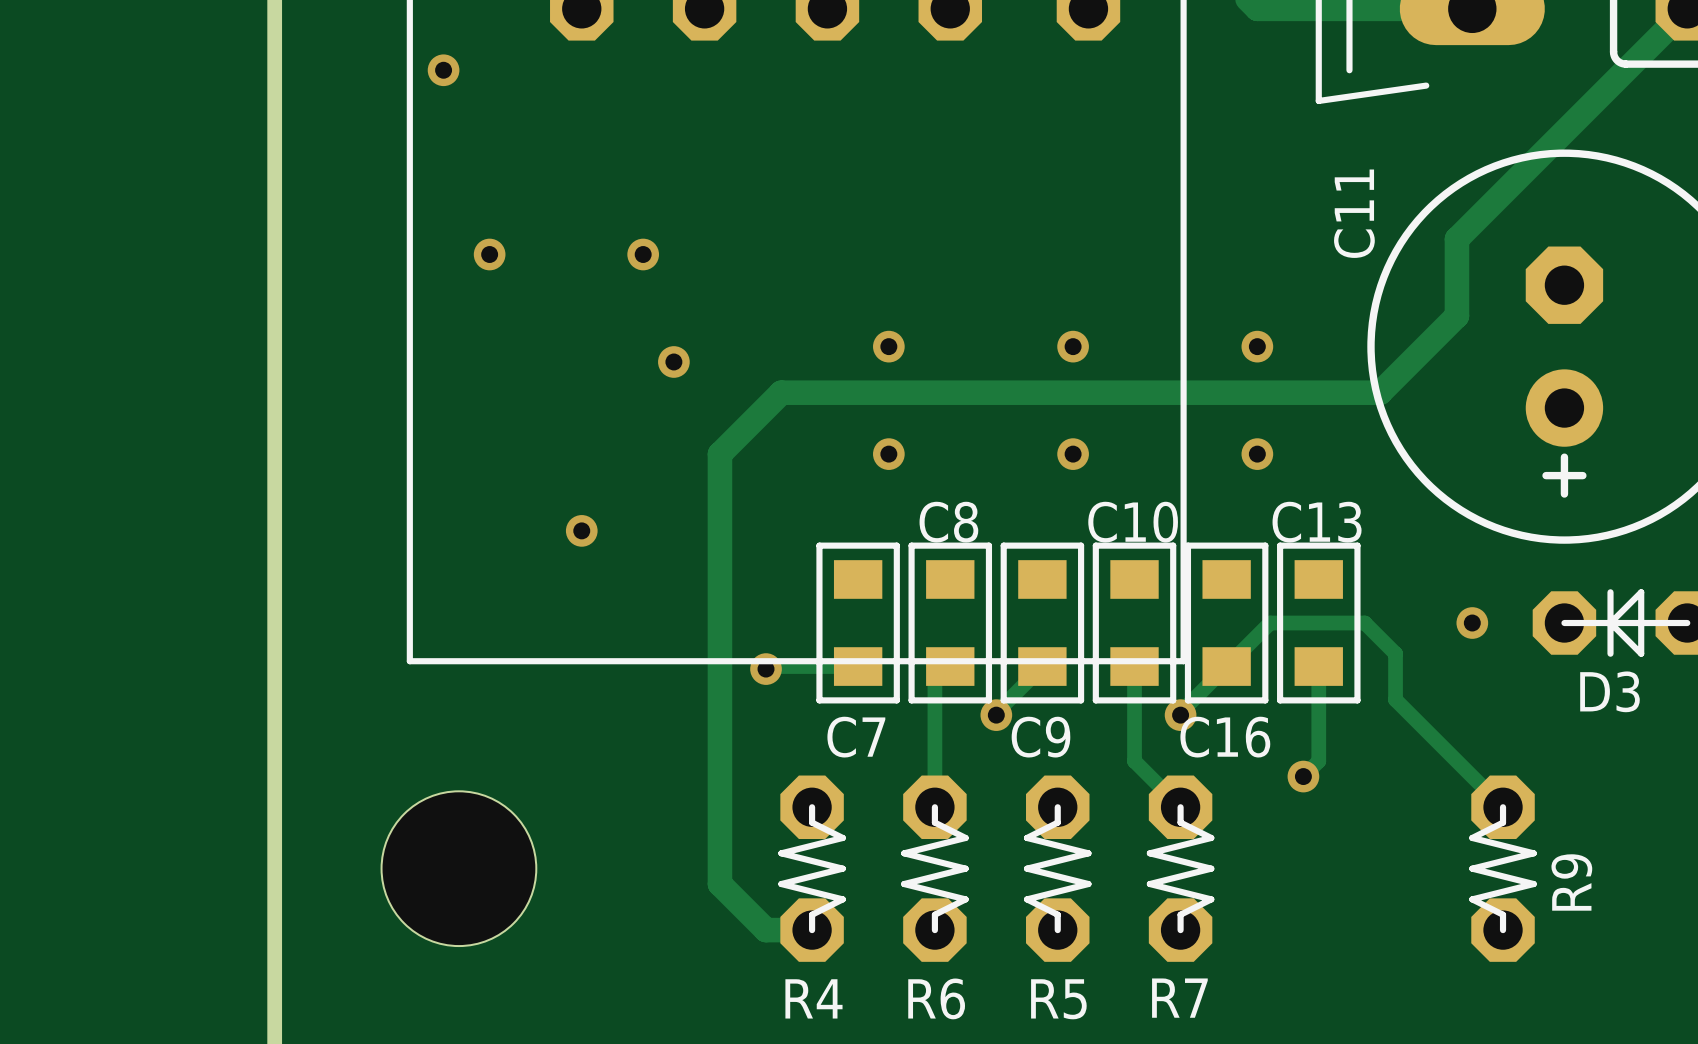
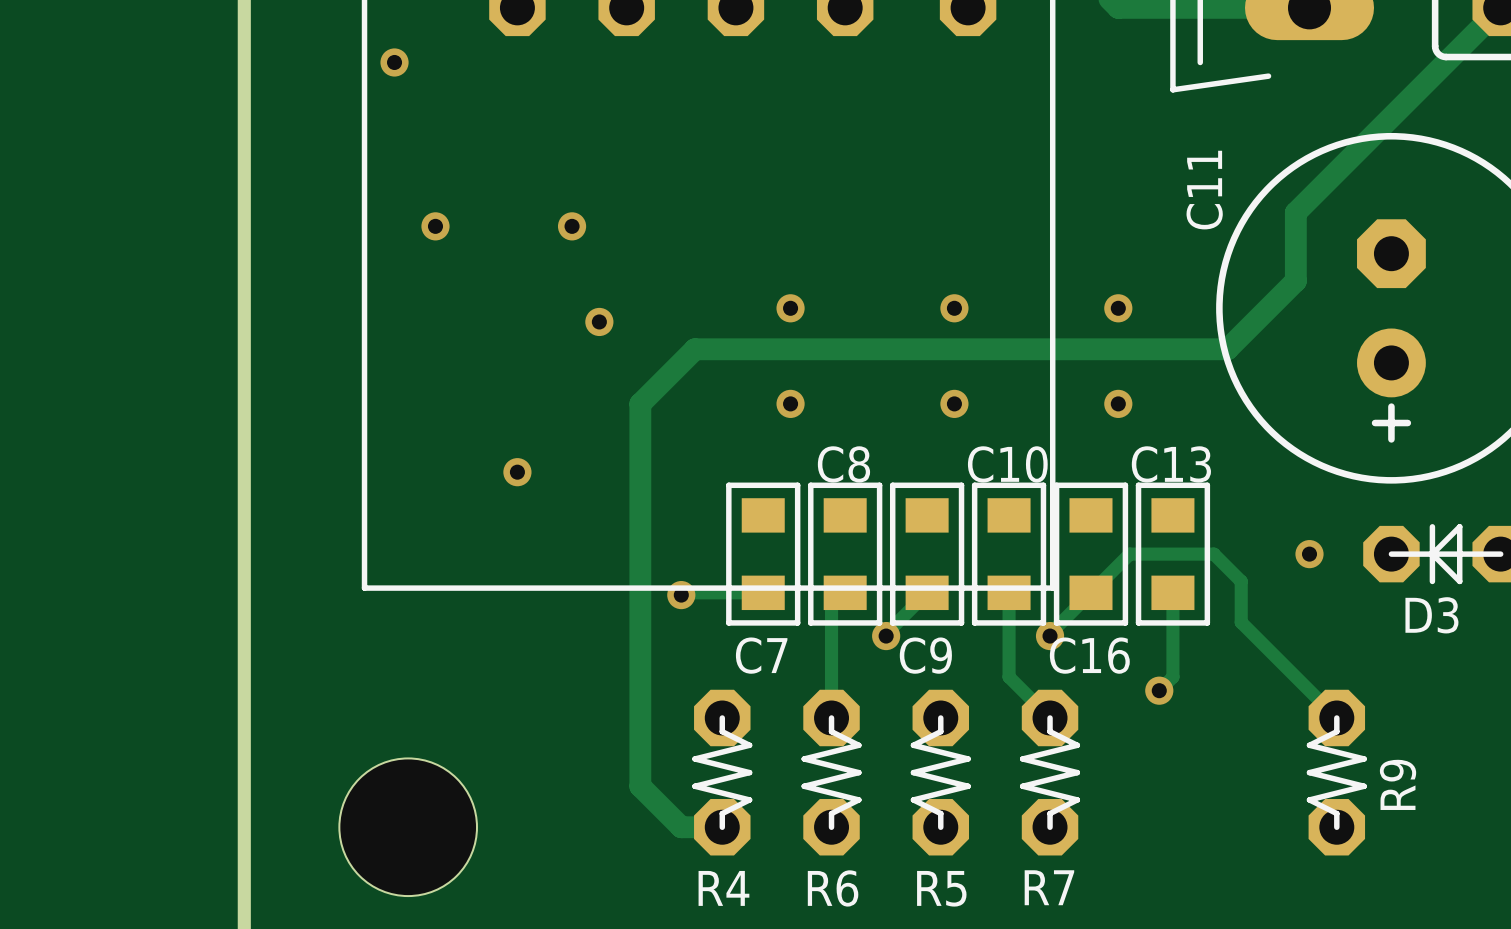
part position: (458, 868) -> (408, 827)

